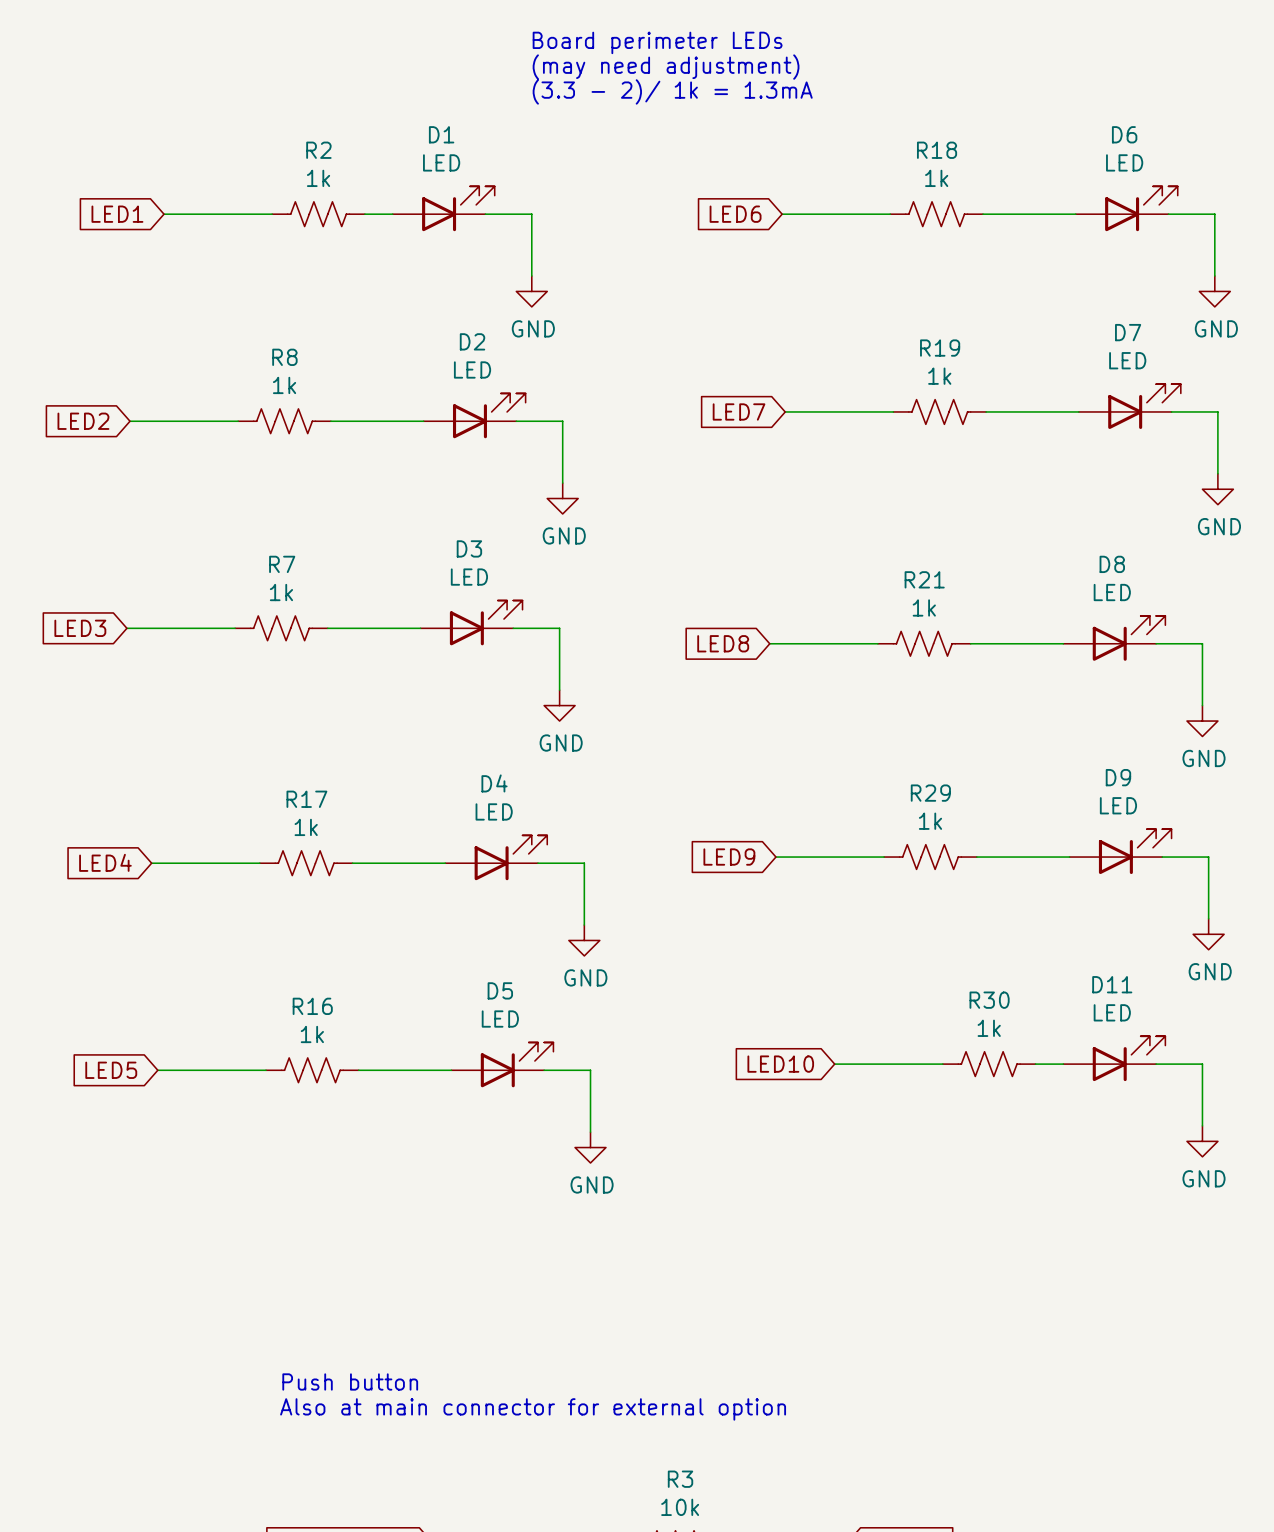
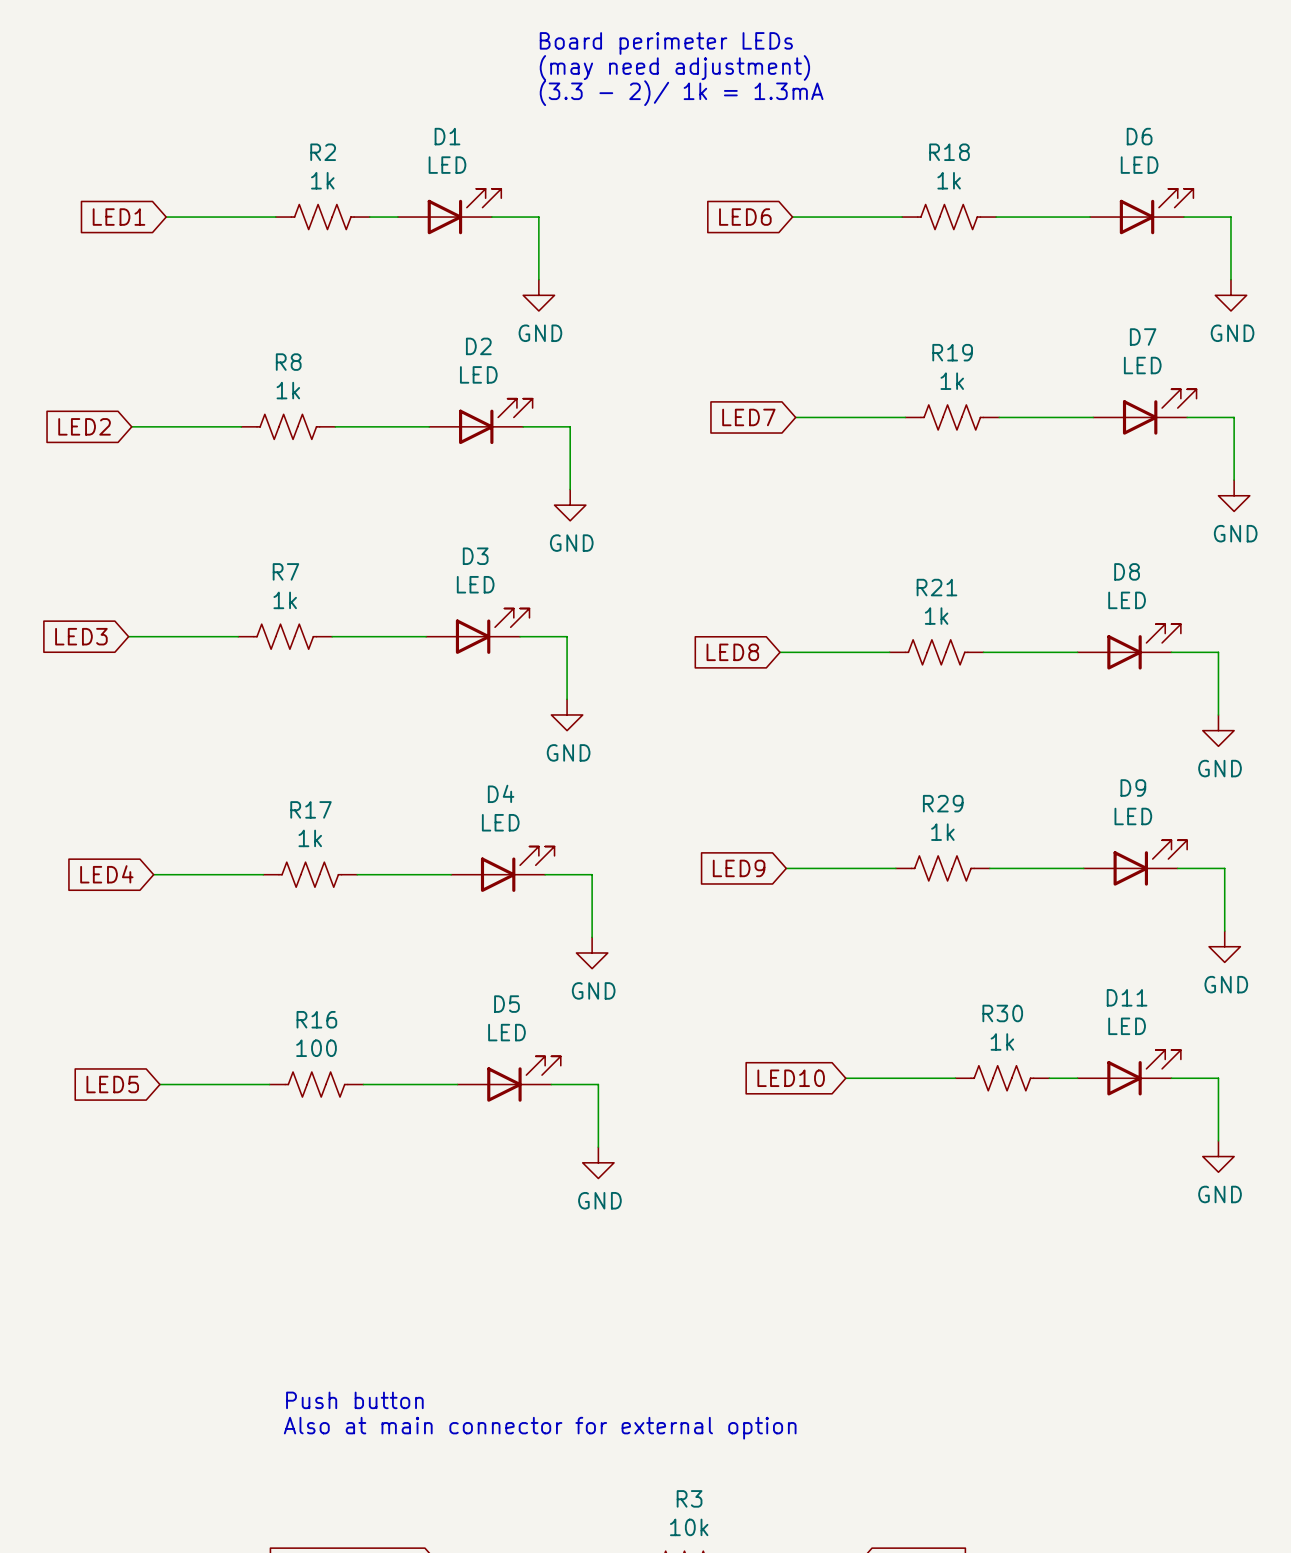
R16 value: 1k (312, 1034) -> 100 (316, 1048)

